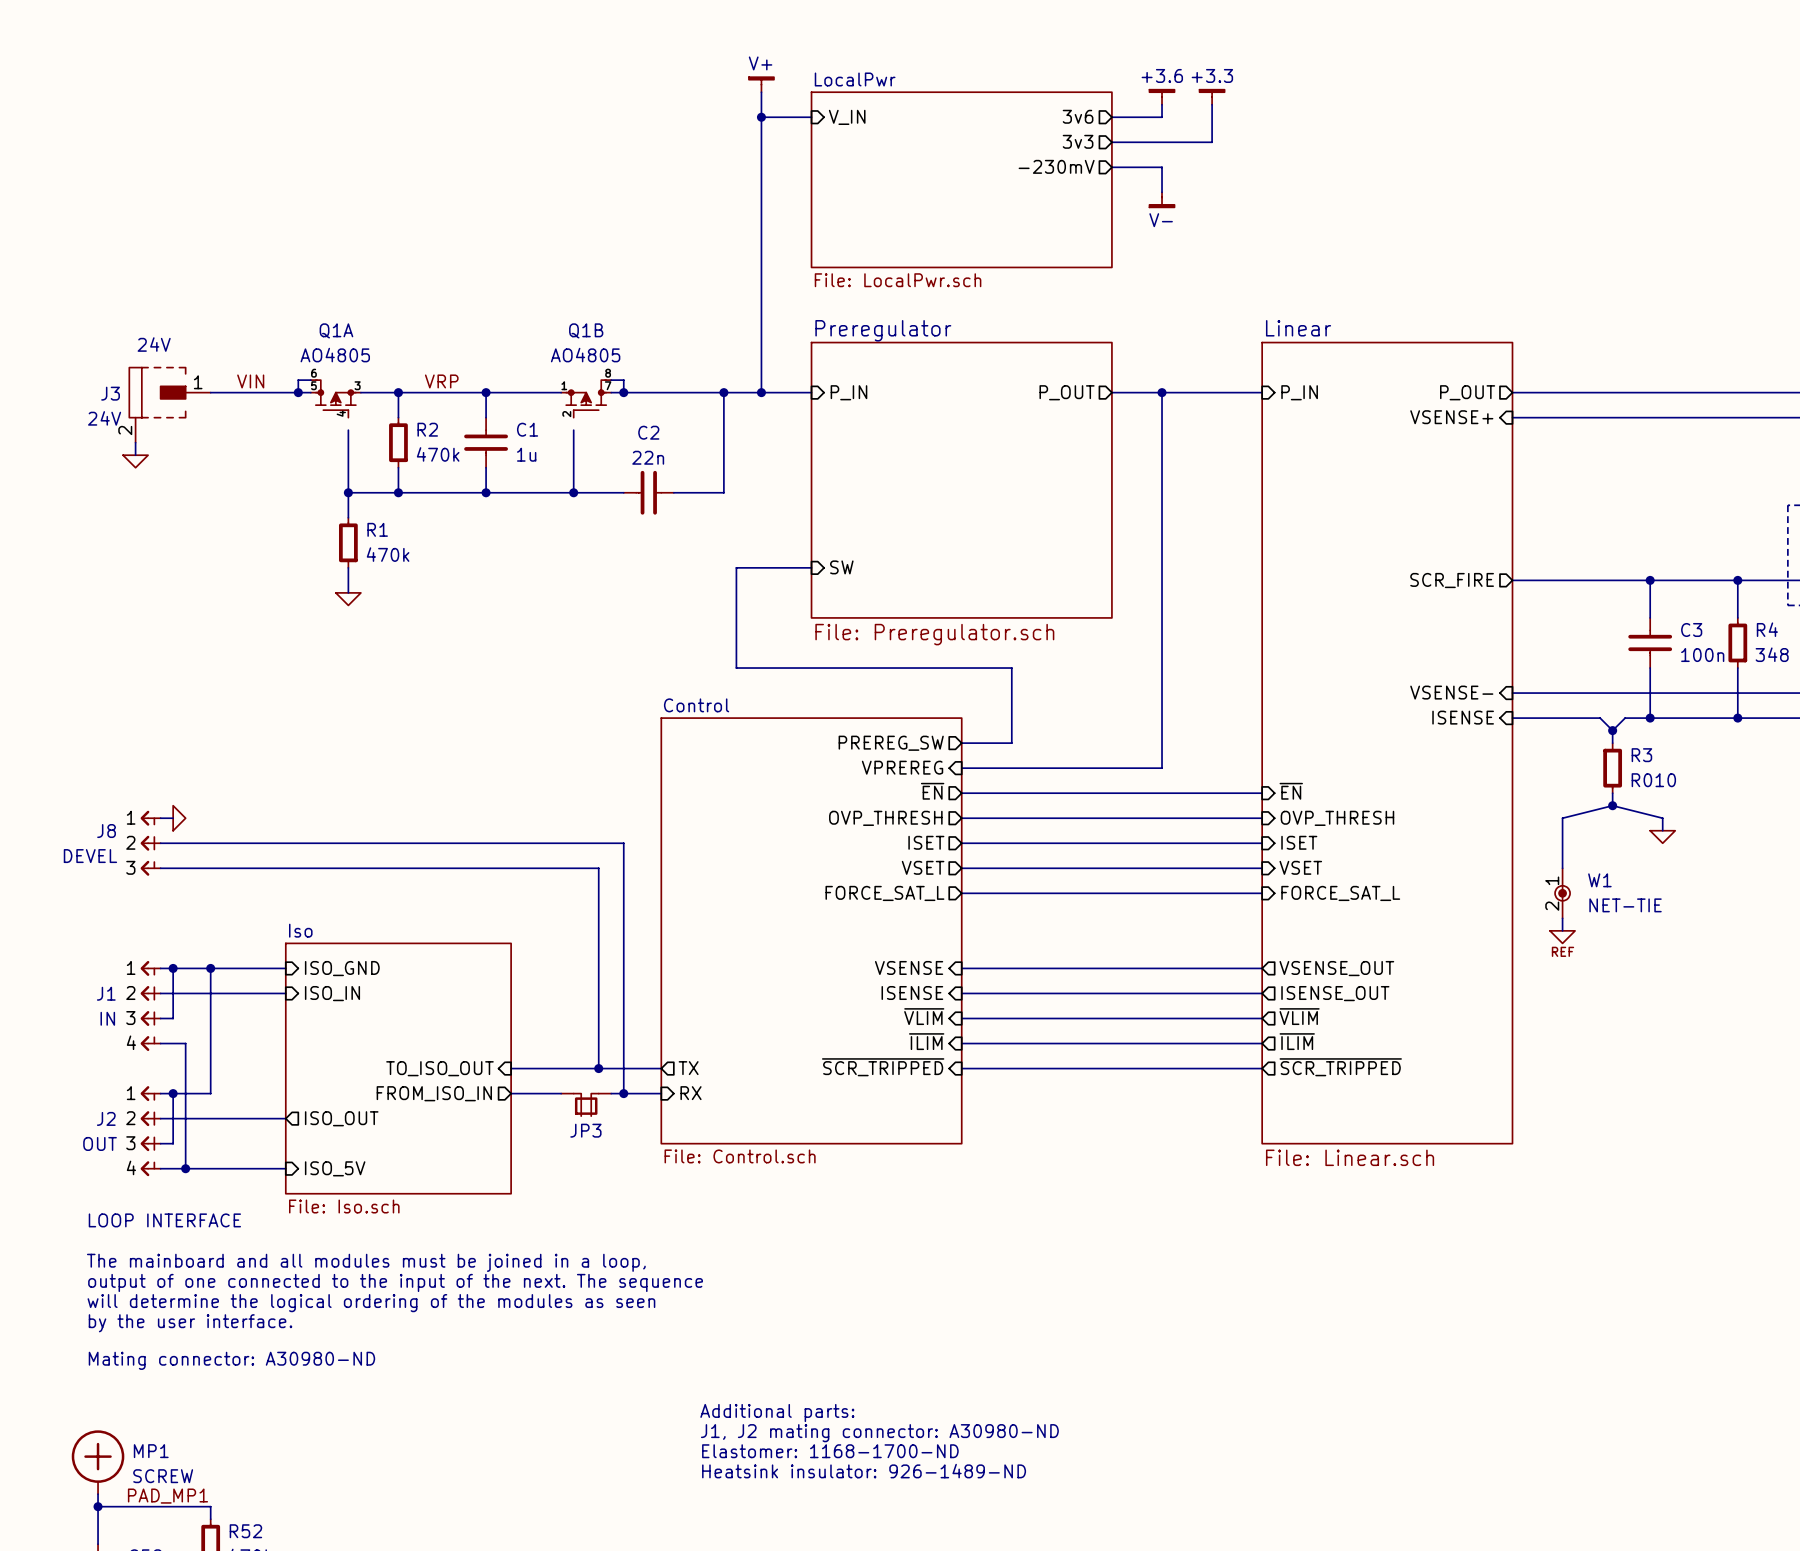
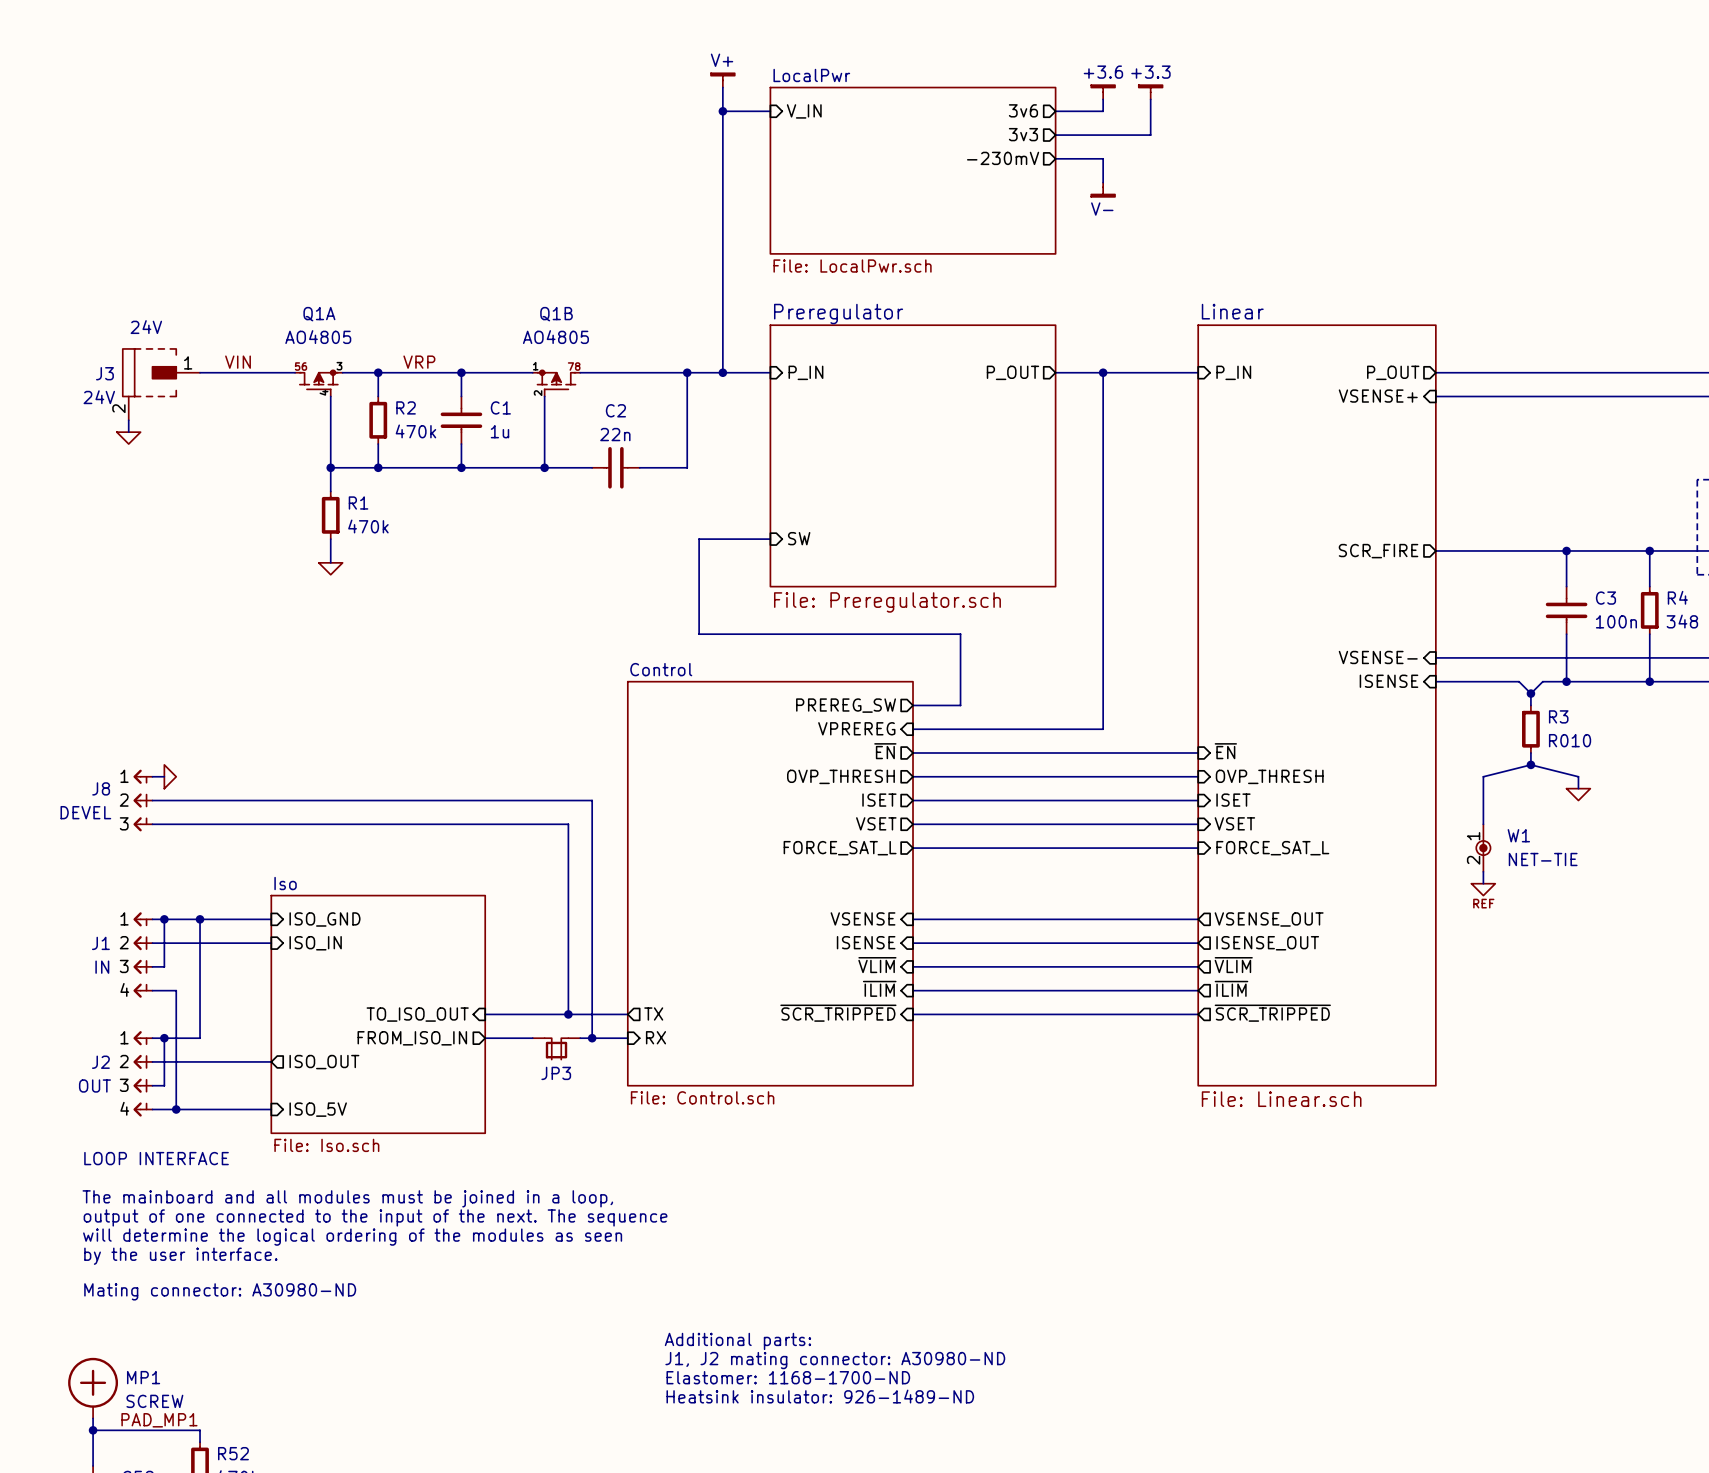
wire: (310, 380) (298, 380) (298, 392) -> none
Q1A symbol: [310, 380, 361, 418] -> [295, 370, 343, 397]
Q1B symbol: [561, 380, 612, 418] -> [532, 370, 581, 397]
wire: (611, 380) (623, 380) (623, 392) -> none
junction: (298, 392) -> none
junction: (623, 392) -> none
wire: none -> (330, 396) (330, 408)
wire: none -> (544, 396) (544, 408)

